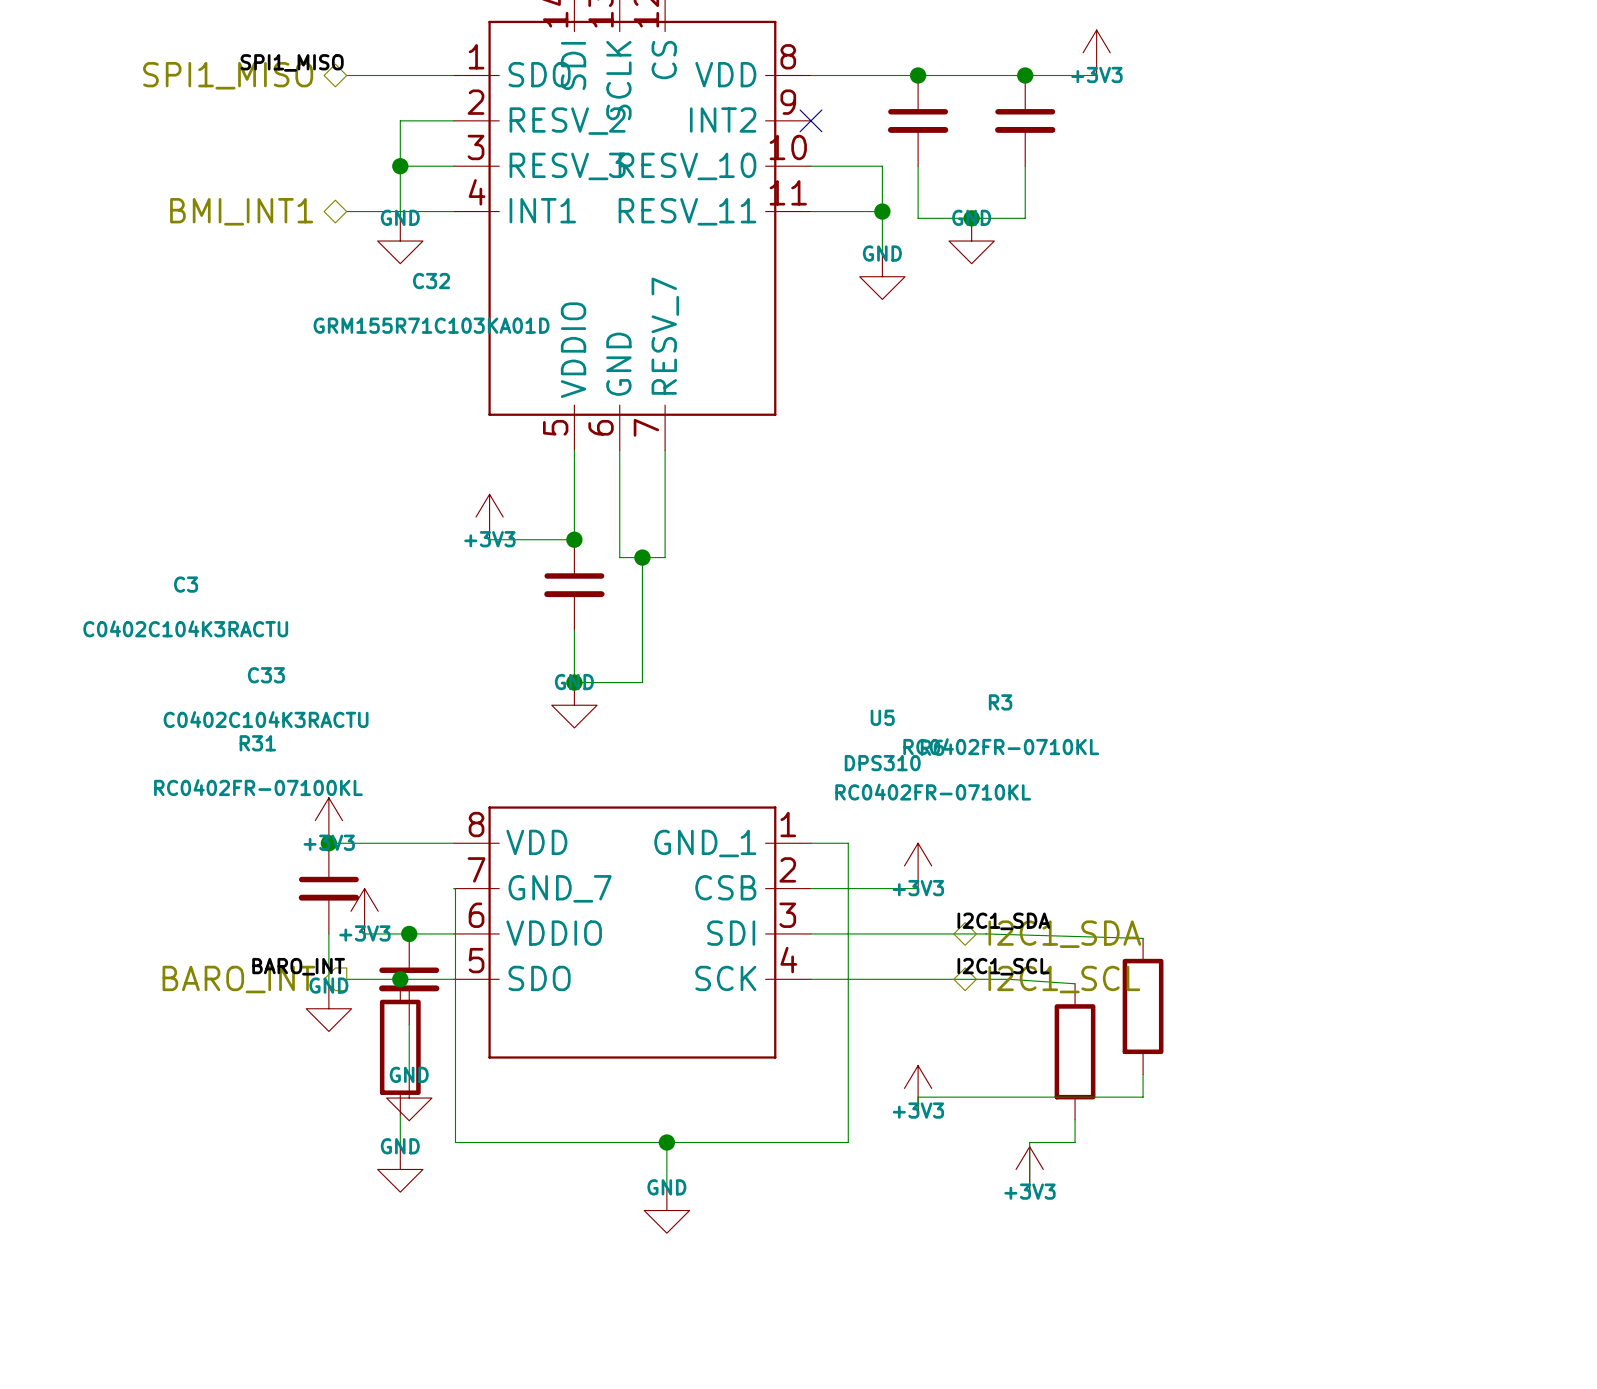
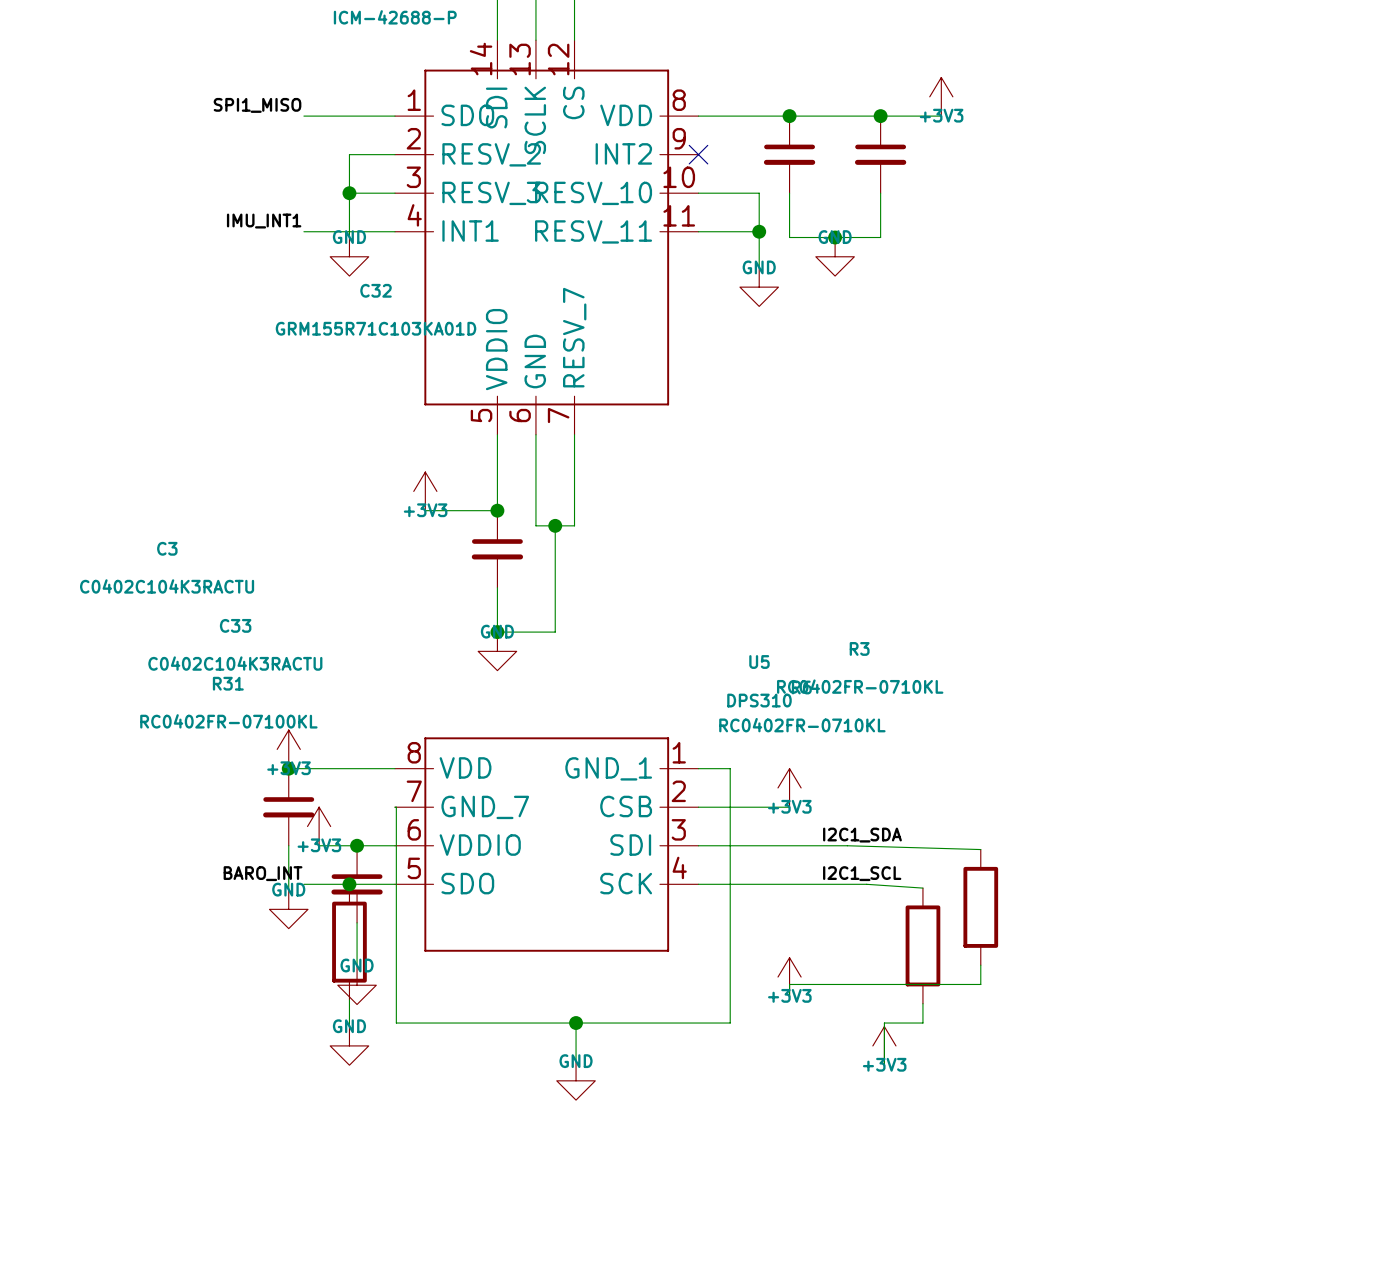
hierarchical label: SPI1_MISO (228, 75) -> none
label: none -> IMU_INT1 (264, 221)
hierarchical label: BMI_INT1 (241, 211) -> none
hierarchical label: I2C1_SDA (1064, 934) -> none
hierarchical label: BARO_INT (238, 979) -> none
hierarchical label: I2C1_SCL (1064, 979) -> none

